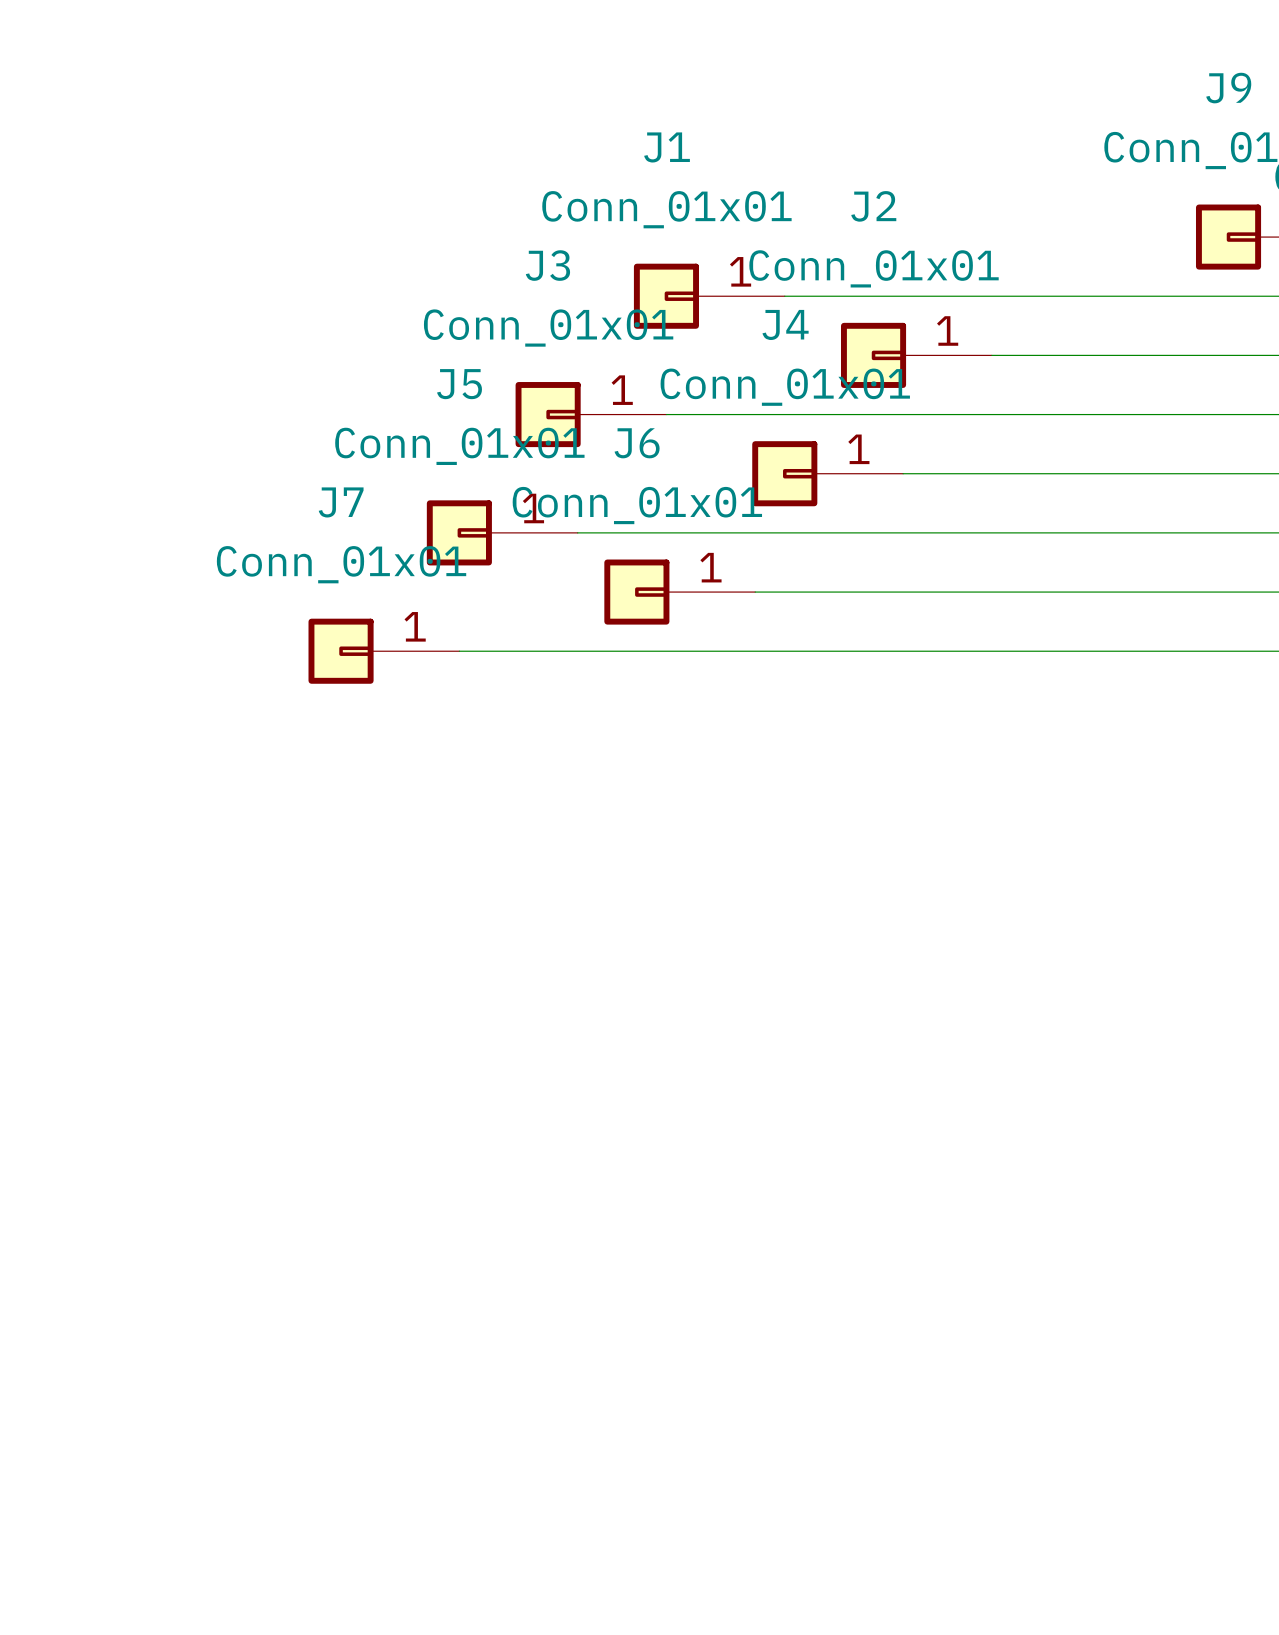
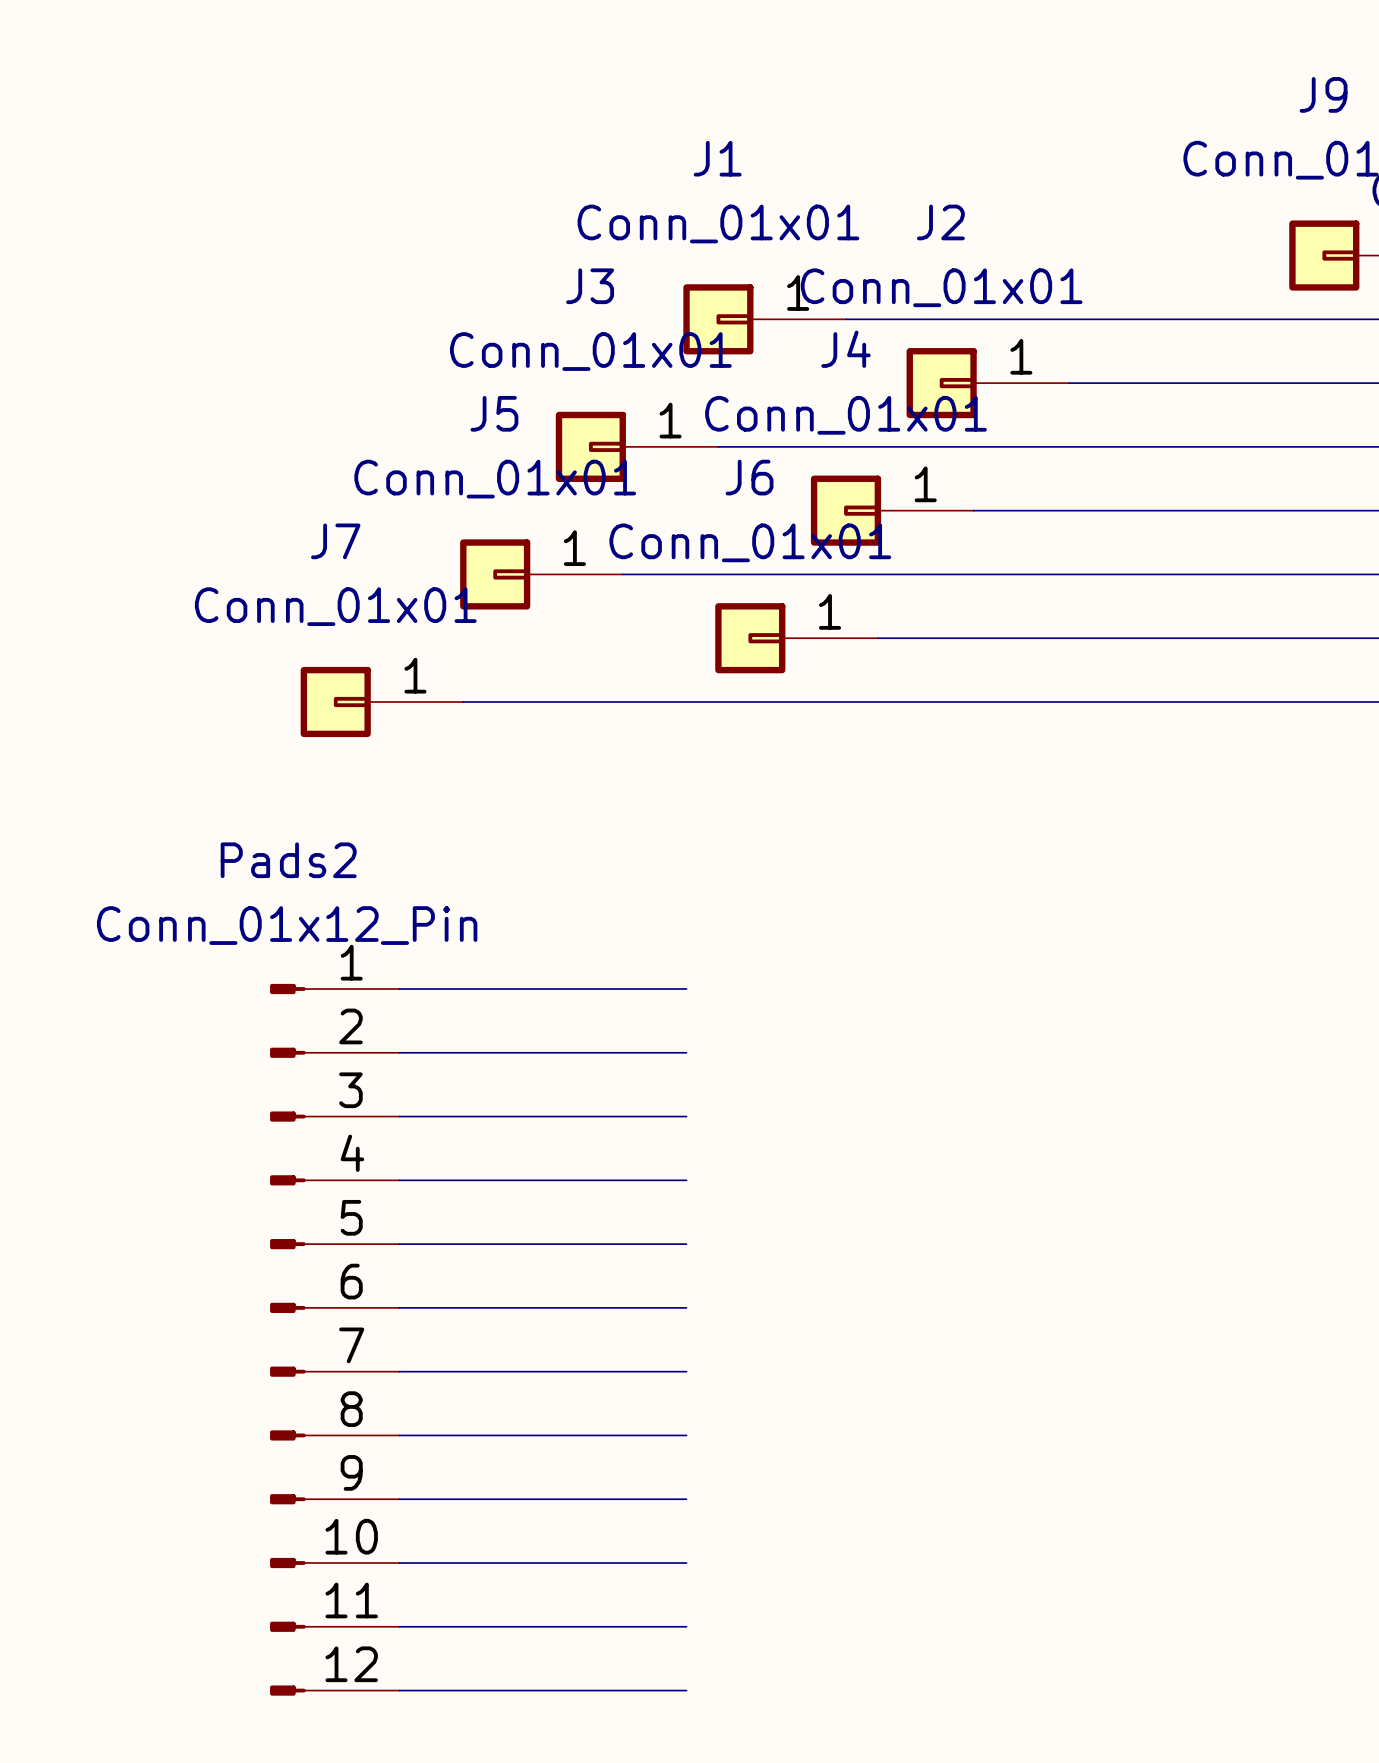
J6 position: (679, 592) -> (796, 638)
J7 position: (383, 651) -> (381, 702)
wire: none -> (399, 989) (686, 989)
wire: none -> (399, 1052) (686, 1052)
wire: none -> (399, 1116) (686, 1116)
wire: none -> (399, 1180) (686, 1180)
wire: none -> (399, 1244) (686, 1244)
wire: none -> (399, 1307) (686, 1307)
Pads2: none -> Conn_01x12_Pin (334, 1339)
wire: none -> (399, 1371) (686, 1371)
wire: none -> (399, 1435) (686, 1435)
wire: none -> (399, 1499) (686, 1499)
wire: none -> (399, 1563) (686, 1563)
wire: none -> (399, 1626) (686, 1626)
wire: none -> (399, 1690) (686, 1690)

